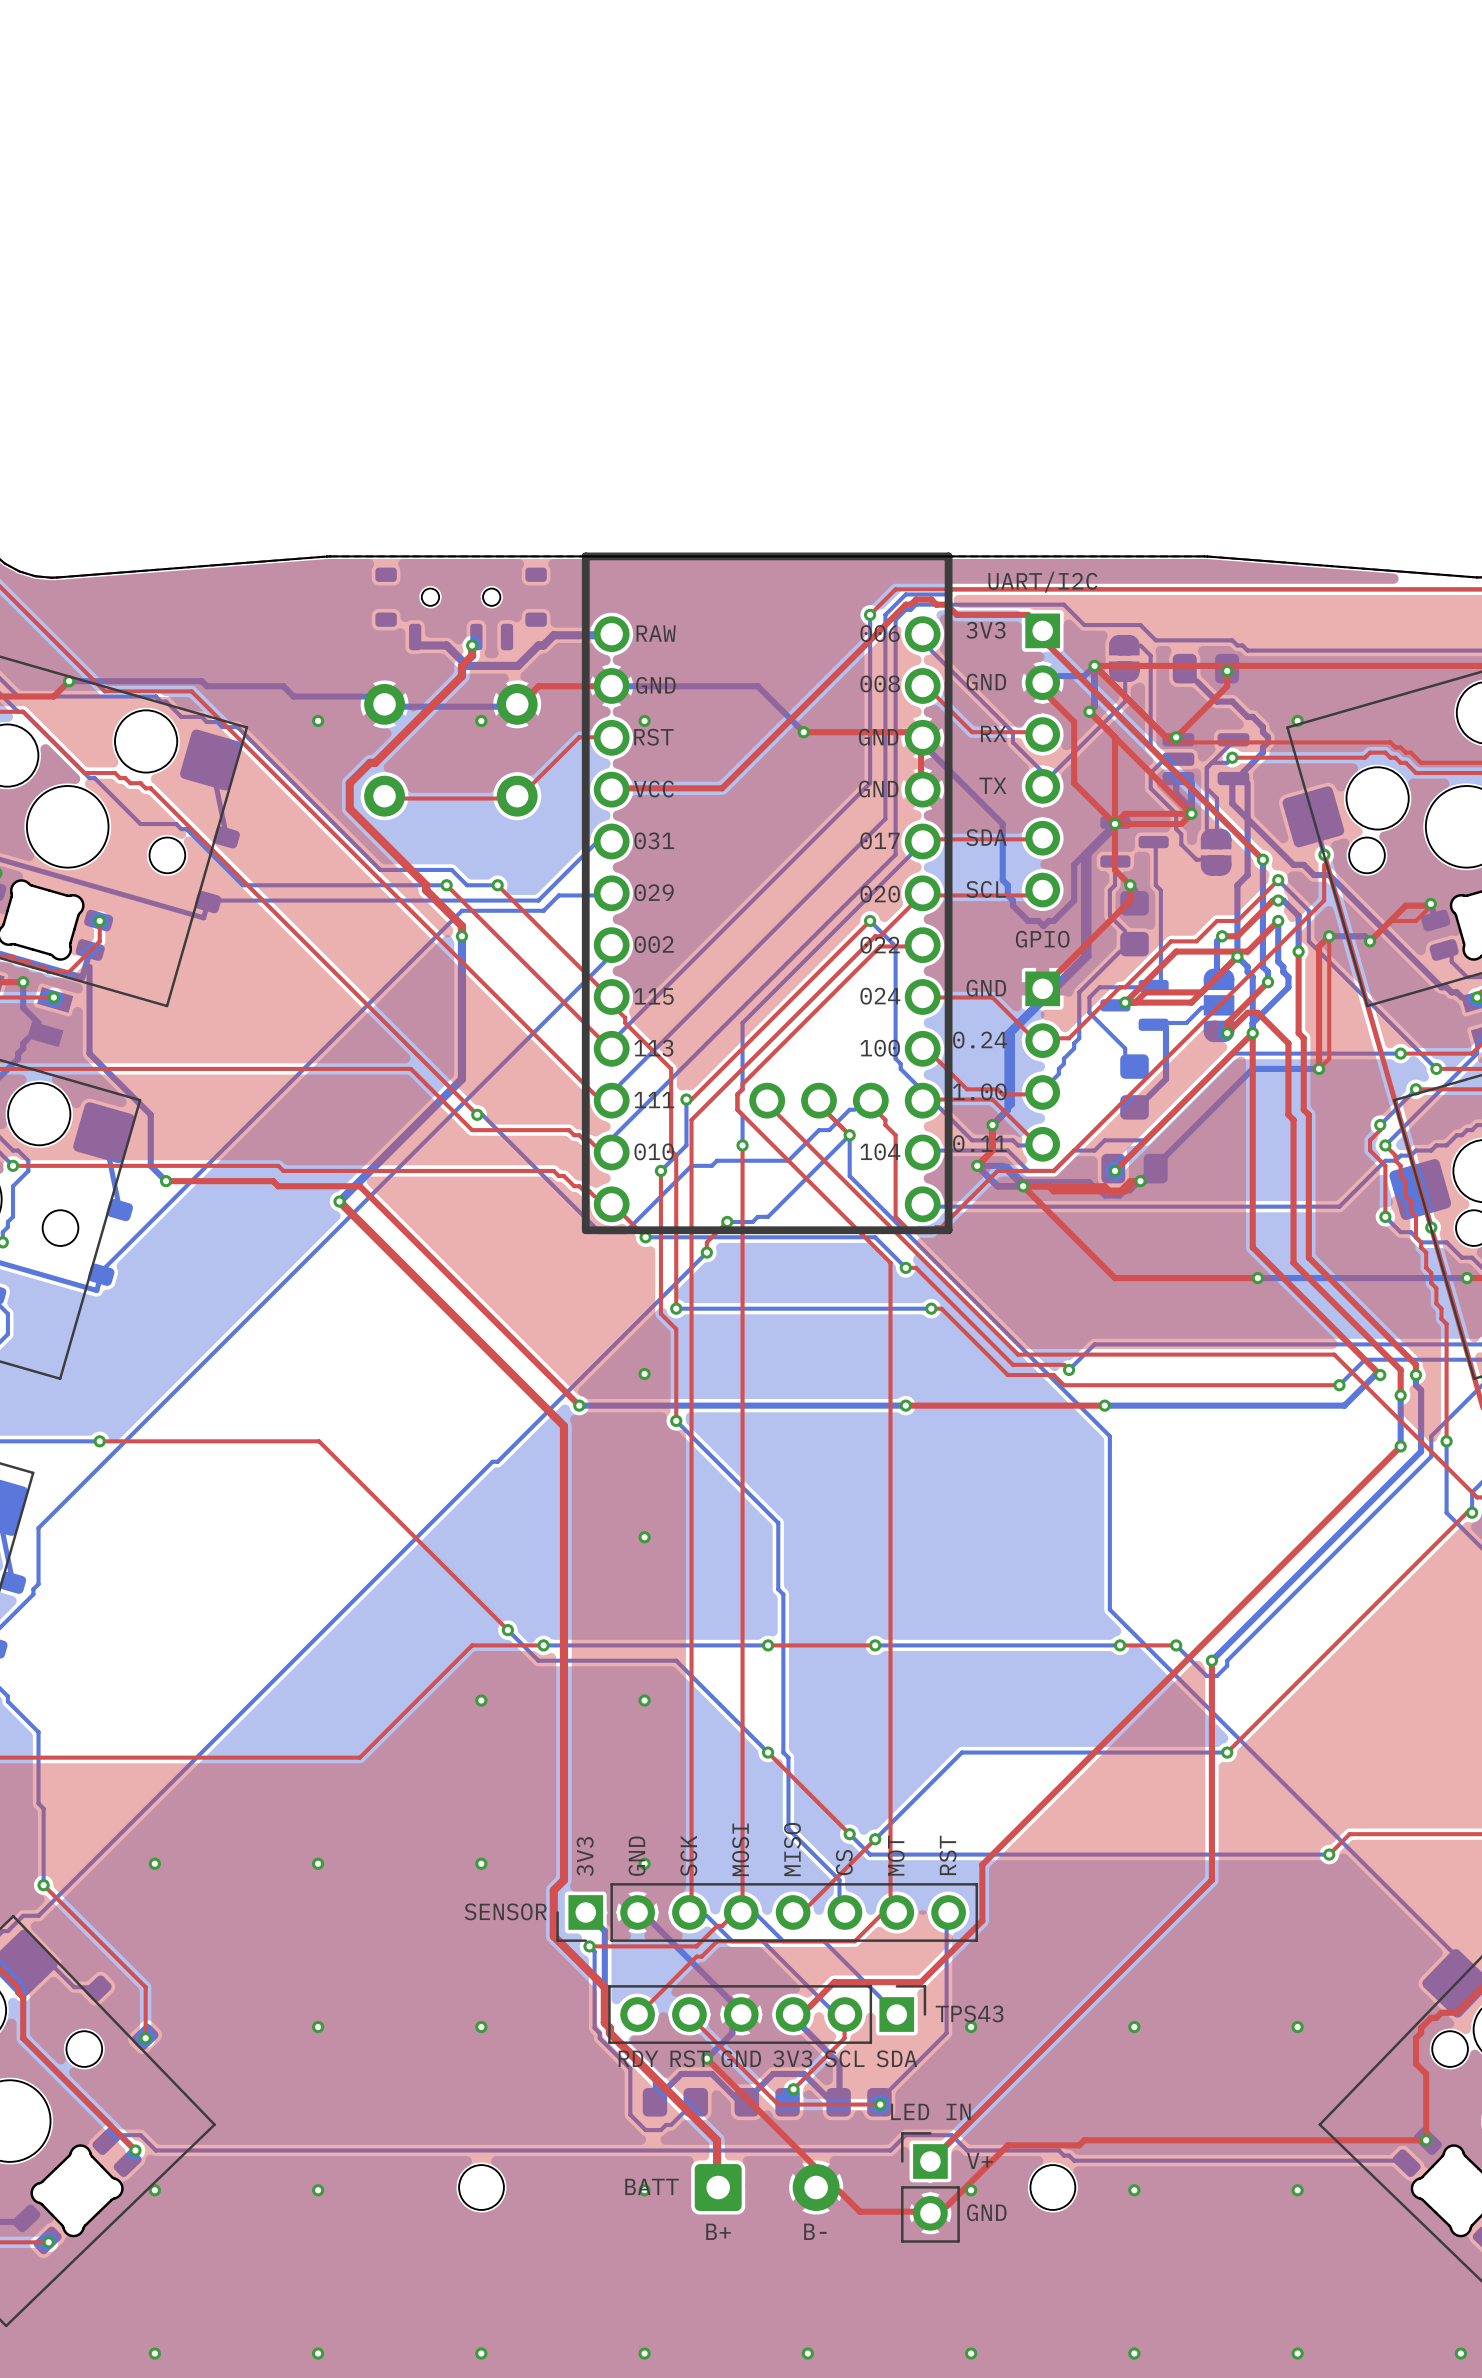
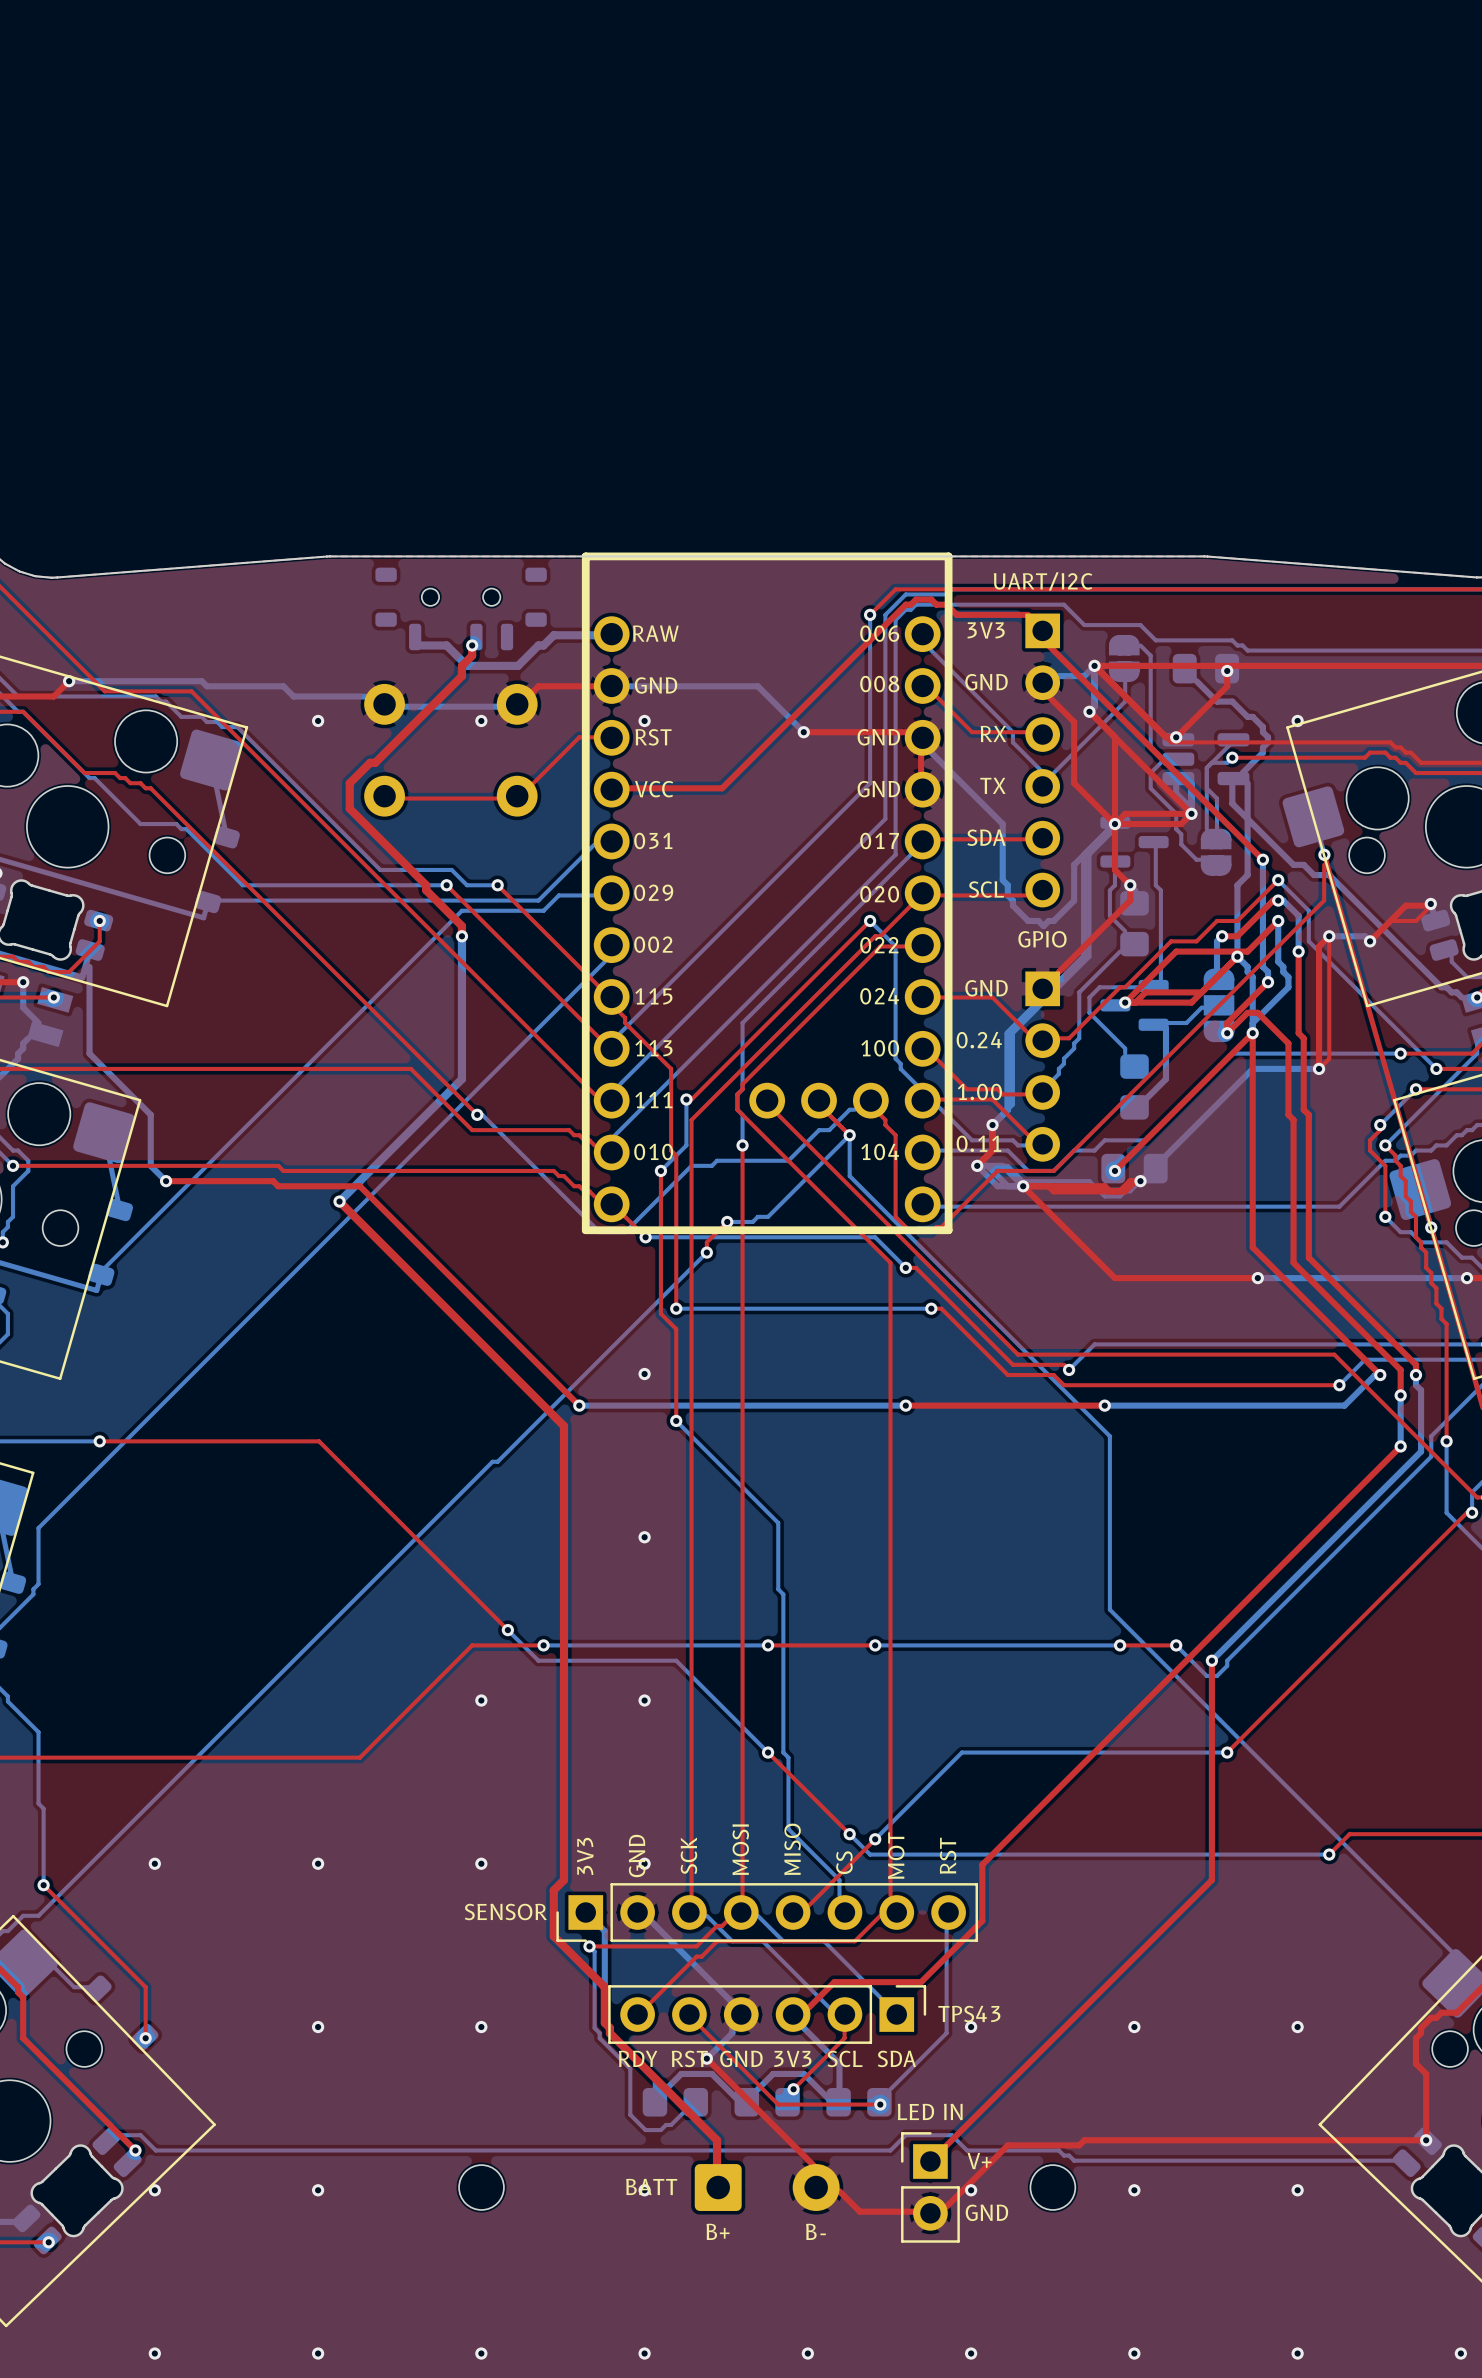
bottom track: none -> (987, 1165) (1007, 1186)

